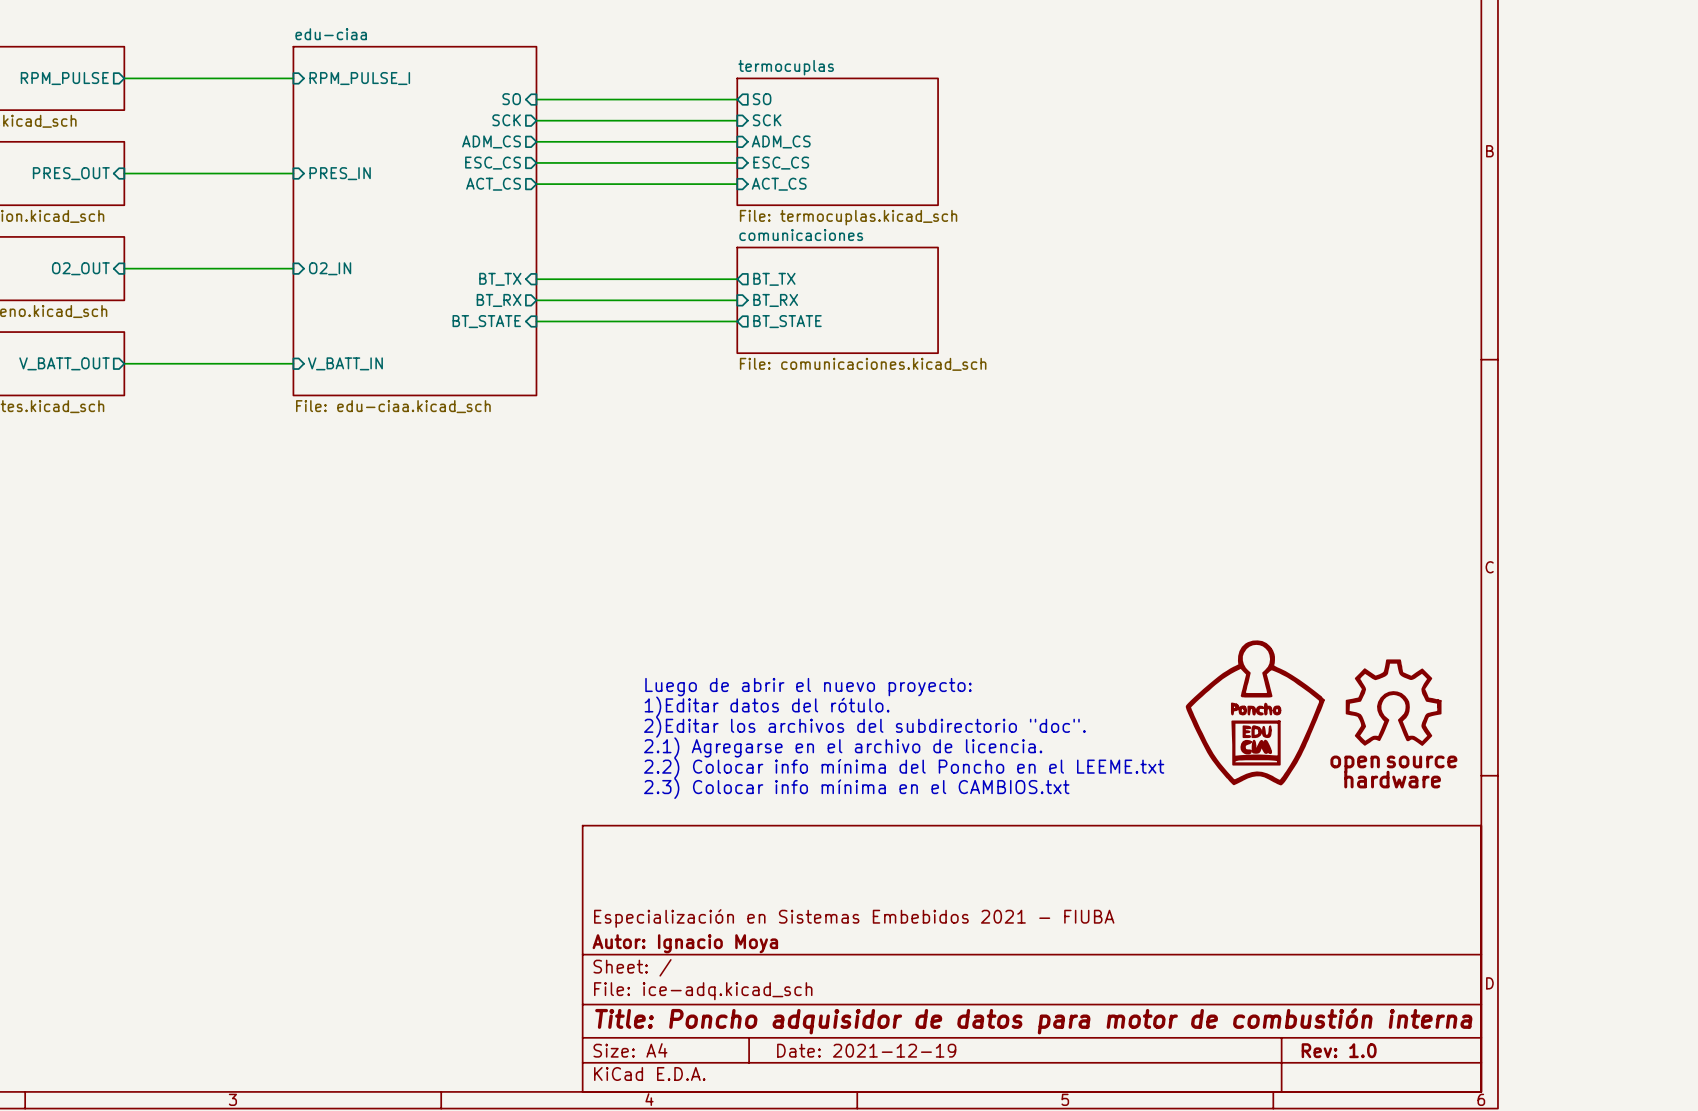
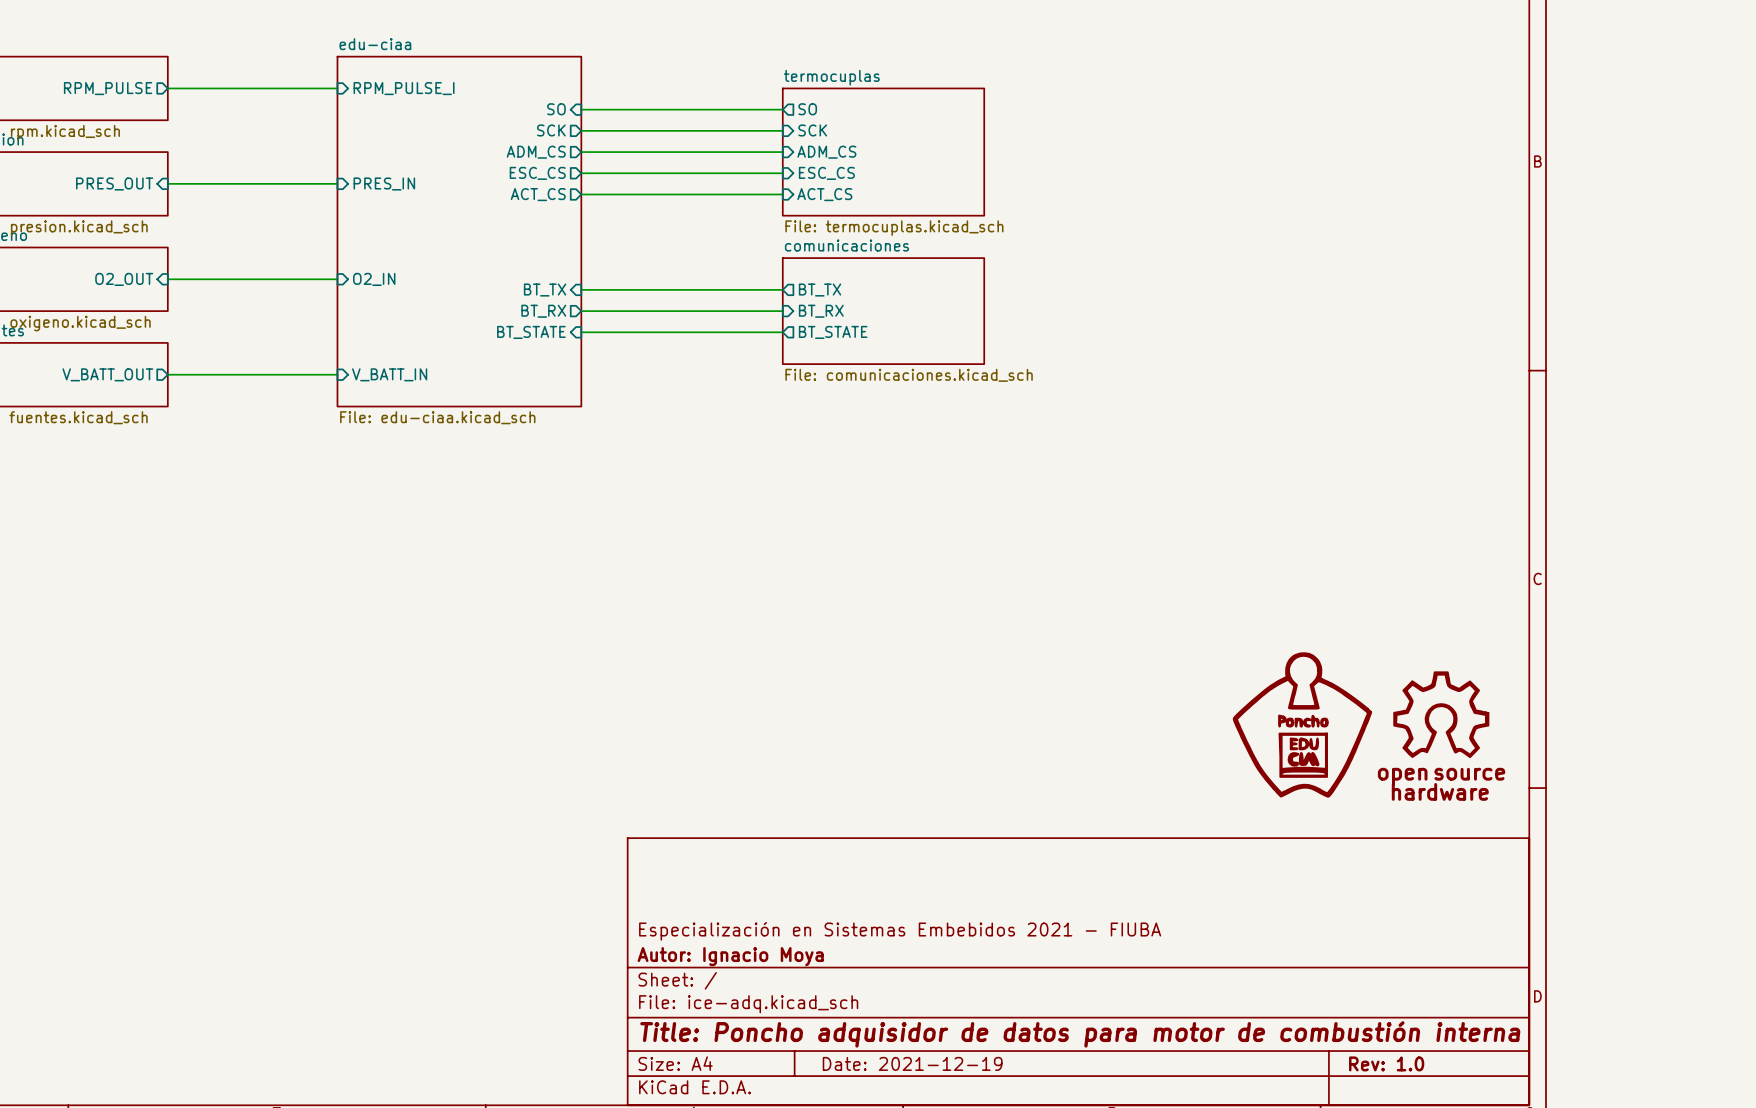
text: Luego de abrir el nuevo proyecto: (808, 687) -> none
text: 1)Editar datos del rótulo. (767, 706) -> none
text: 2)Editar los archivos del subdirectorio "doc". (864, 727) -> none
text: 2.1) Agregarse en el archivo de licencia. (843, 747) -> none
text: 2.2) Colocar info mínima del Poncho en el LEEME.txt (904, 768) -> none
text: 2.3) Colocar info mínima en el CAMBIOS.txt (856, 788) -> none

